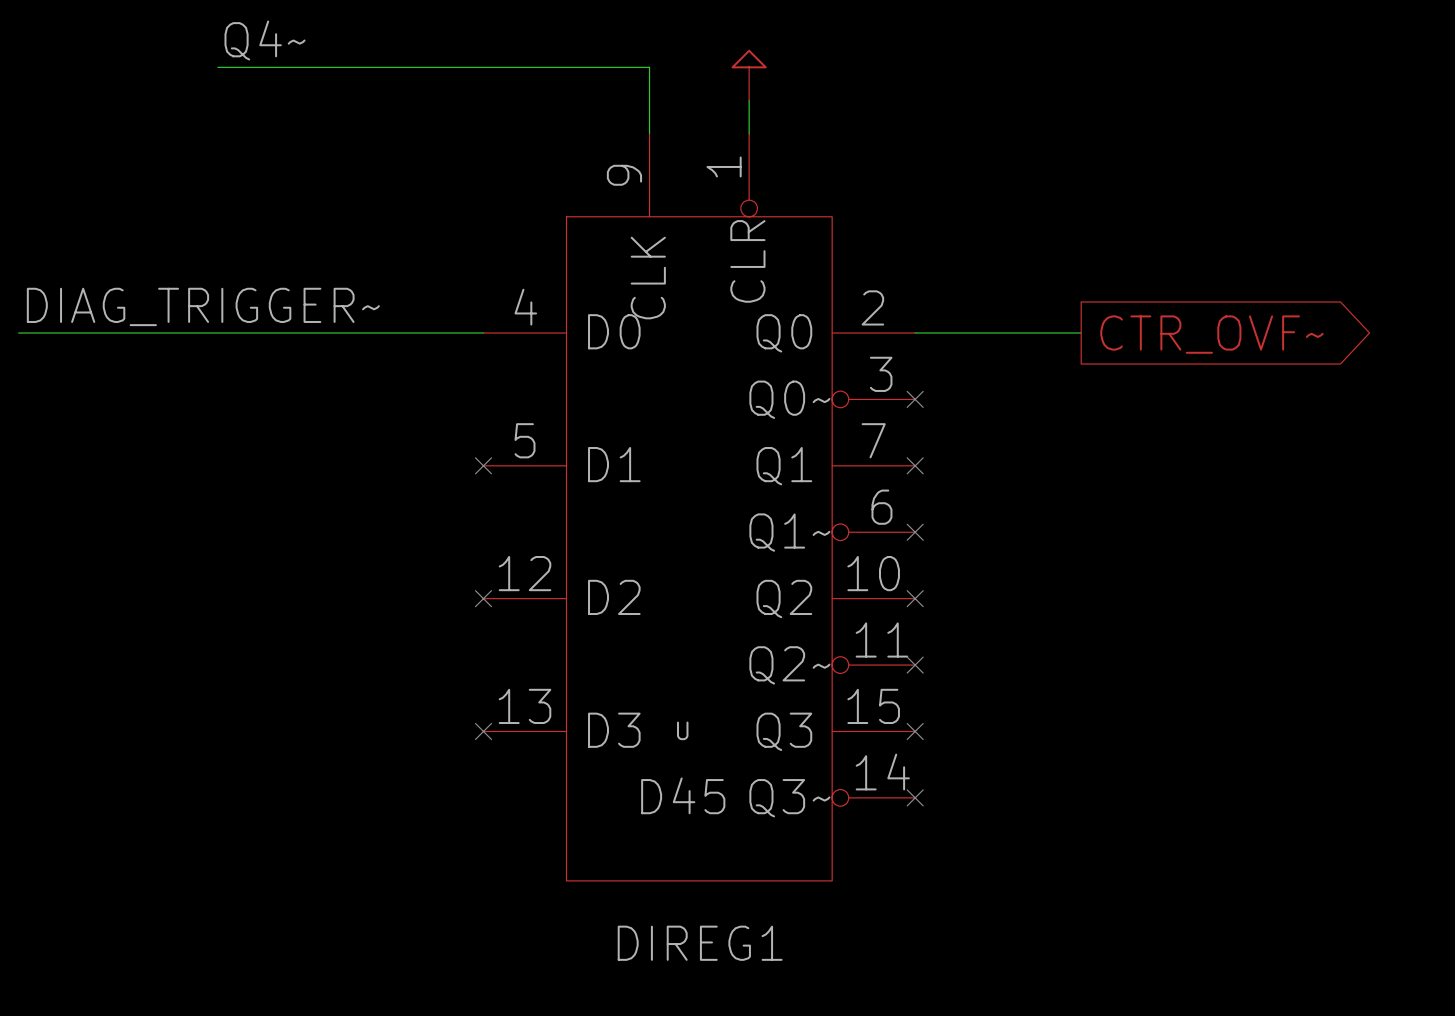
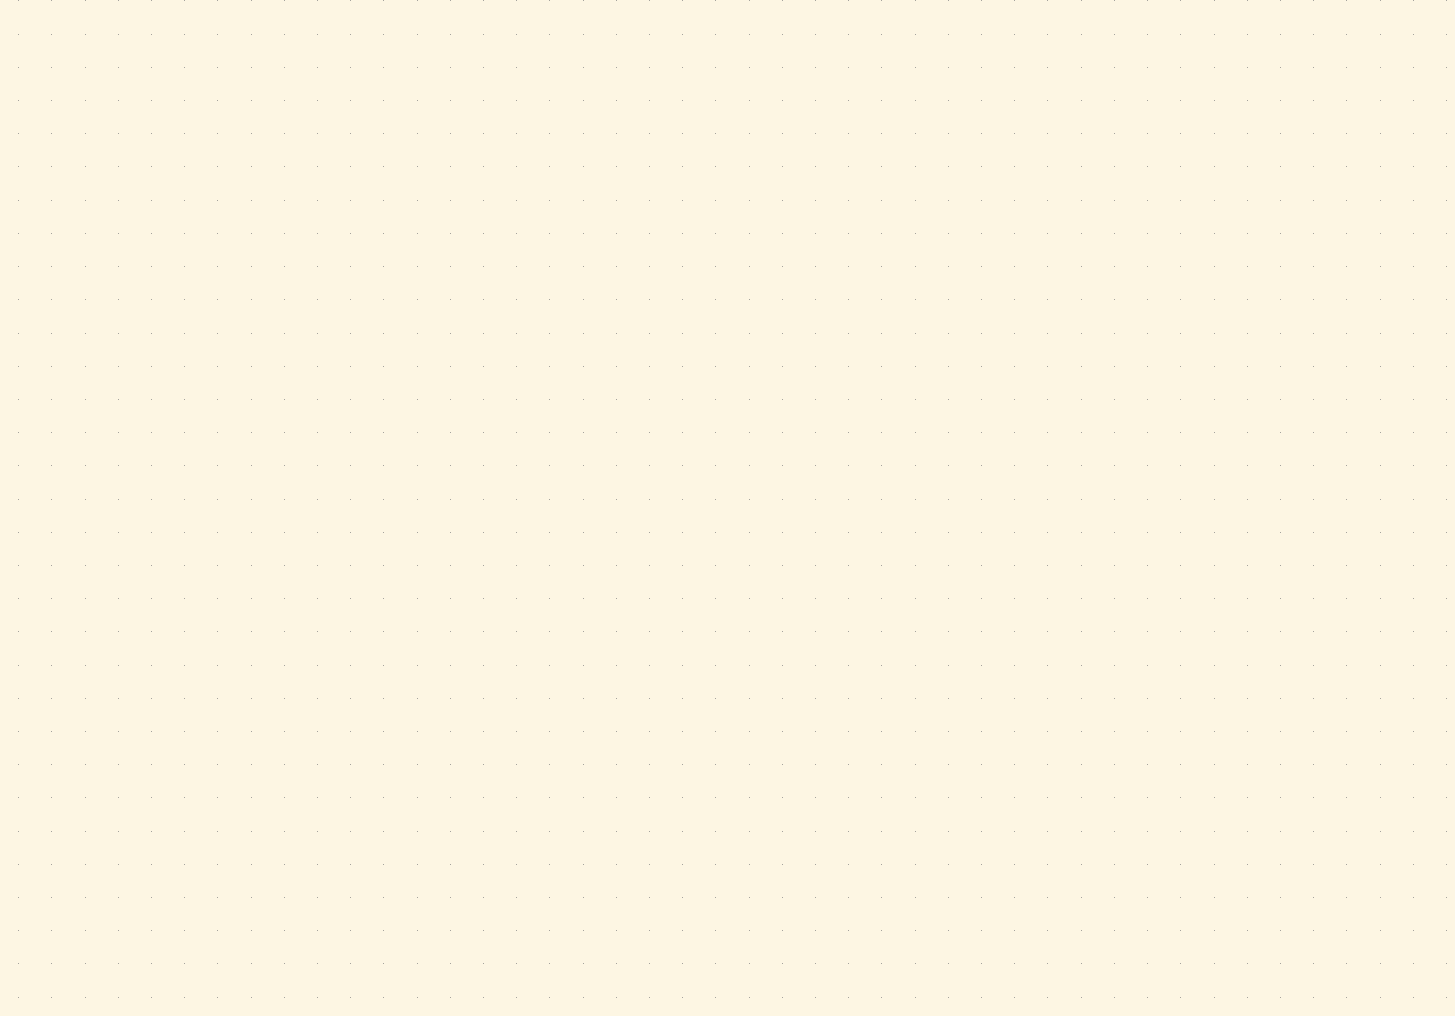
label: Q4~ (265, 40) -> none
wire: (217, 67) (649, 67) (649, 133) -> none
power symbol: (749, 75) -> none
wire: (749, 100) (749, 133) -> none
label: DIAG_TRIGGER~ (203, 306) -> none
wire: (18, 333) (483, 333) -> none
wire: (915, 333) (1081, 333) -> none
global label: CTR_OVF~ (1211, 334) -> none
no-connect mark: (915, 399) -> none
no-connect mark: (483, 465) -> none
no-connect mark: (915, 465) -> none
U: (699, 507) -> none
no-connect mark: (915, 532) -> none
no-connect mark: (483, 598) -> none
no-connect mark: (915, 598) -> none
no-connect mark: (915, 665) -> none
no-connect mark: (483, 731) -> none
no-connect mark: (915, 731) -> none
no-connect mark: (915, 797) -> none

